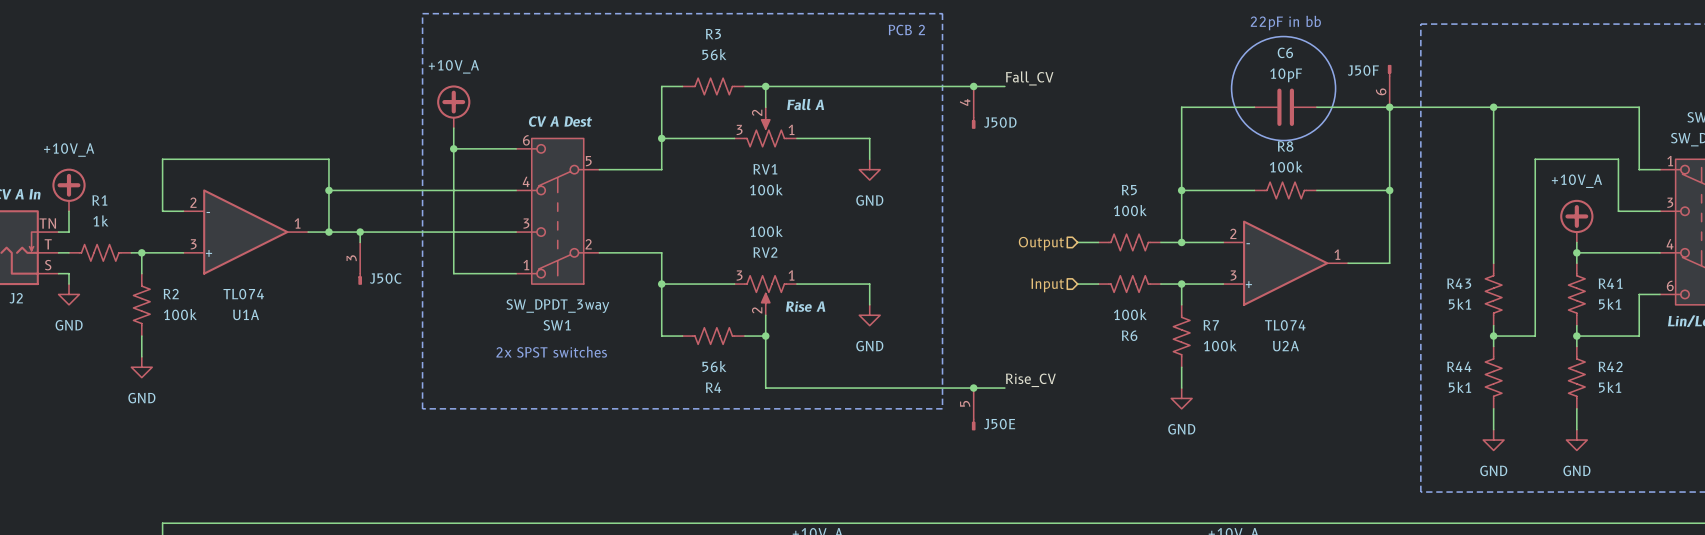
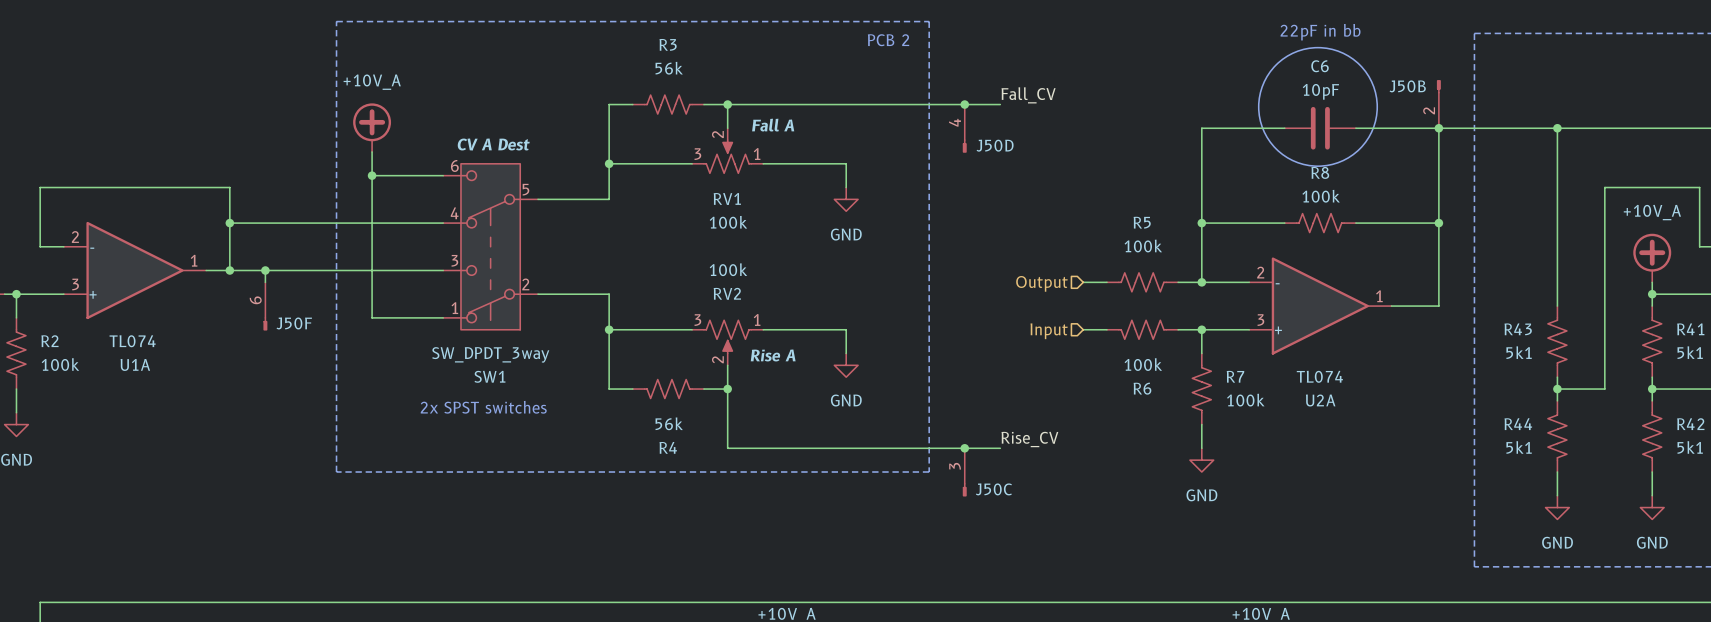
J50F rotation: 0° (1389, 70) -> 180° (265, 323)
J50F position: (1389, 86) -> (265, 306)
J50B: none -> (1438, 104)
J50C position: (360, 263) -> (964, 472)
J50E: (973, 409) -> none

